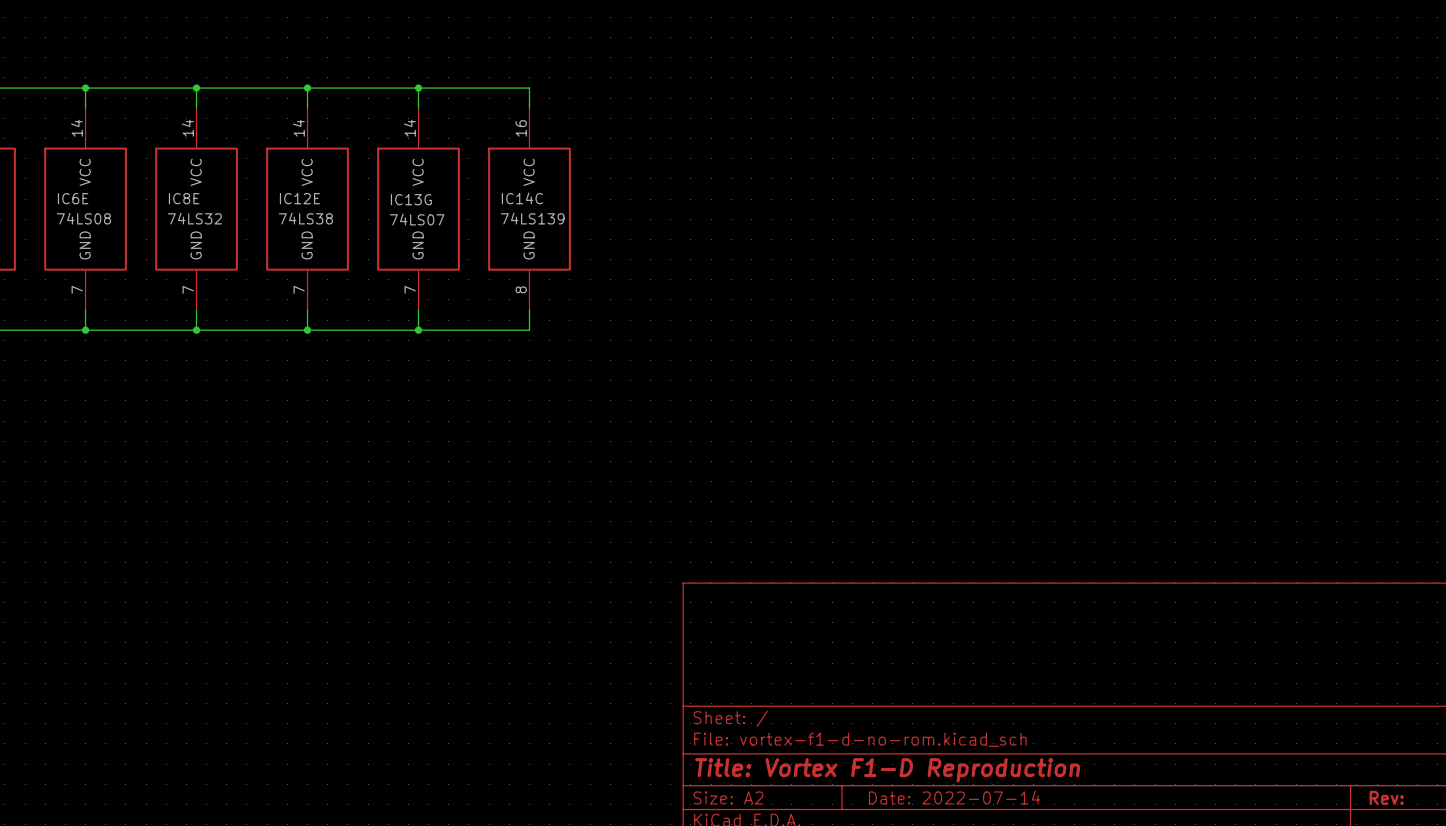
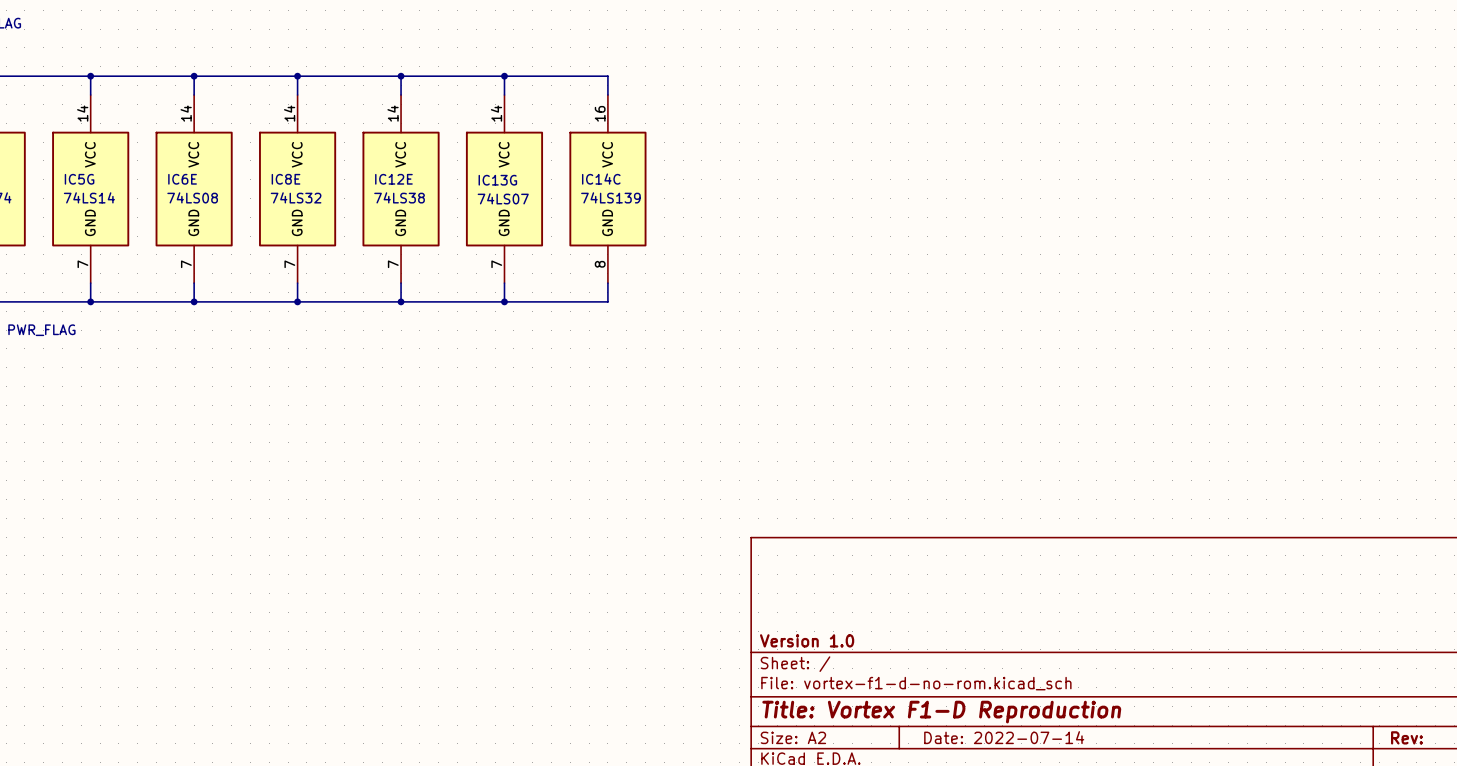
title block: none -> Version 1.0 (807, 640)

